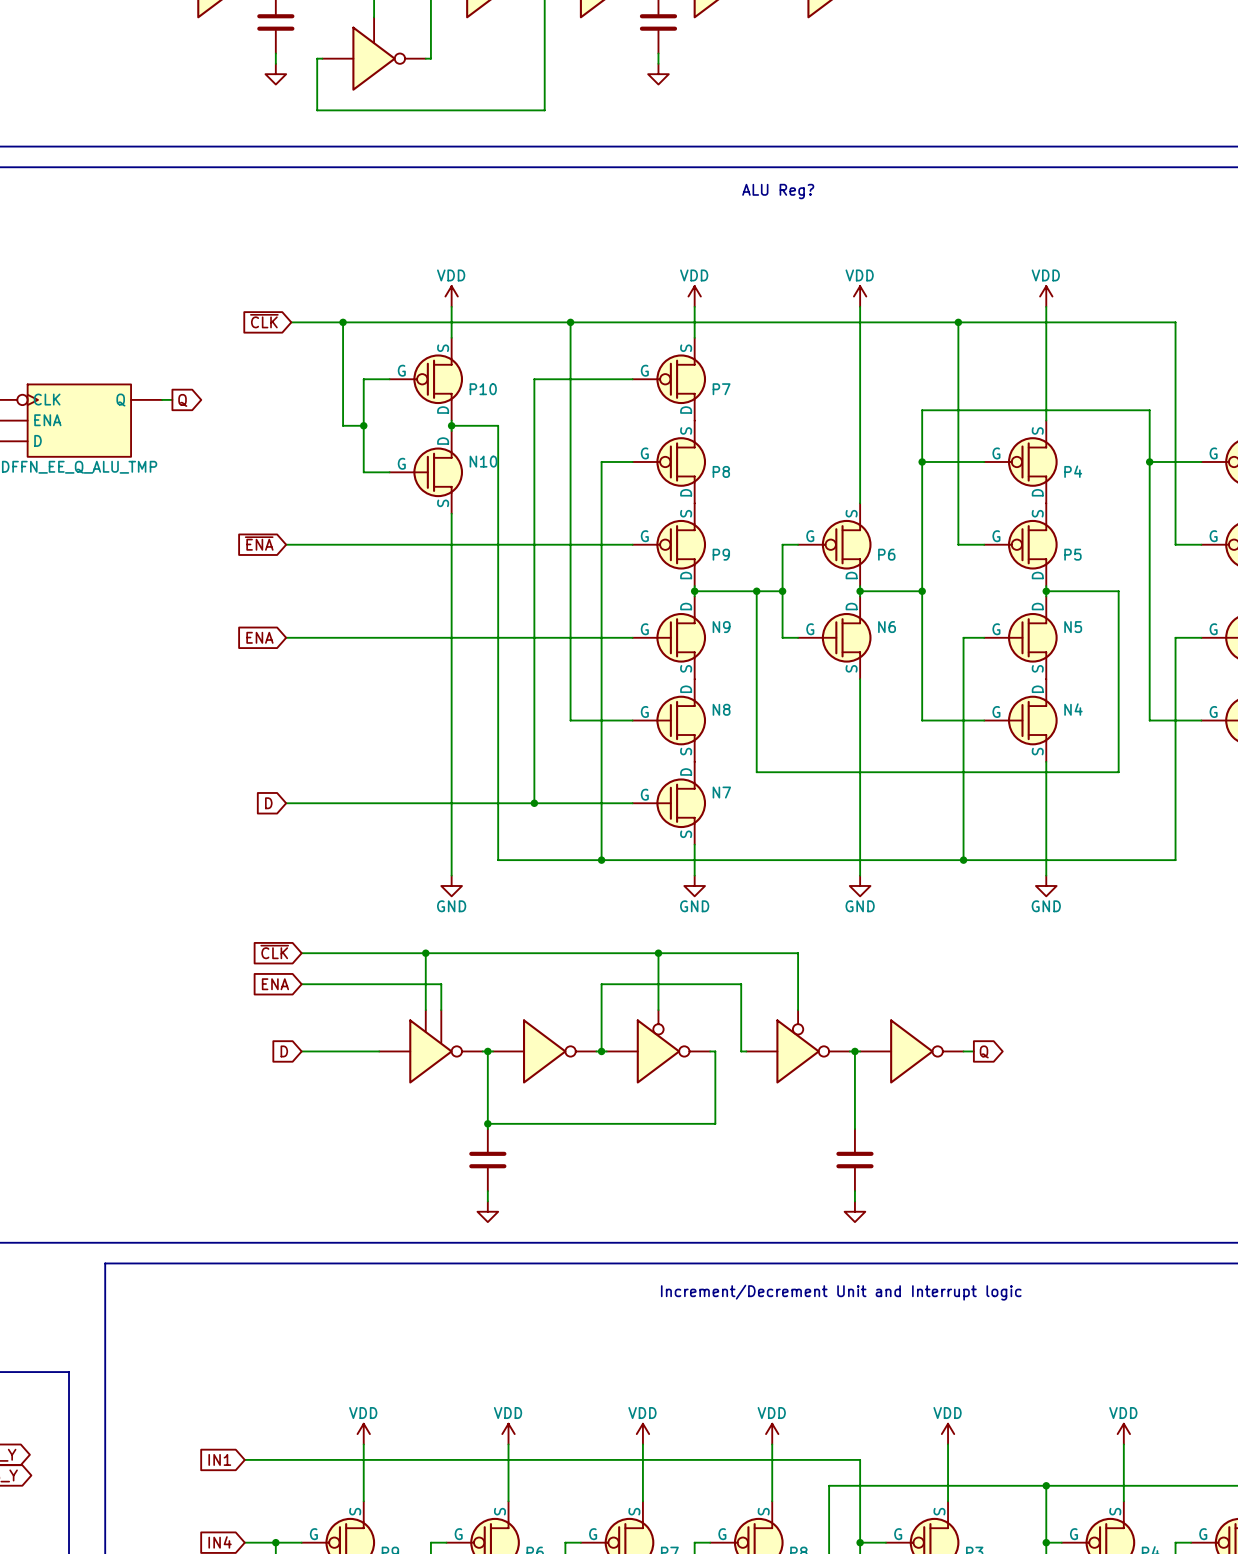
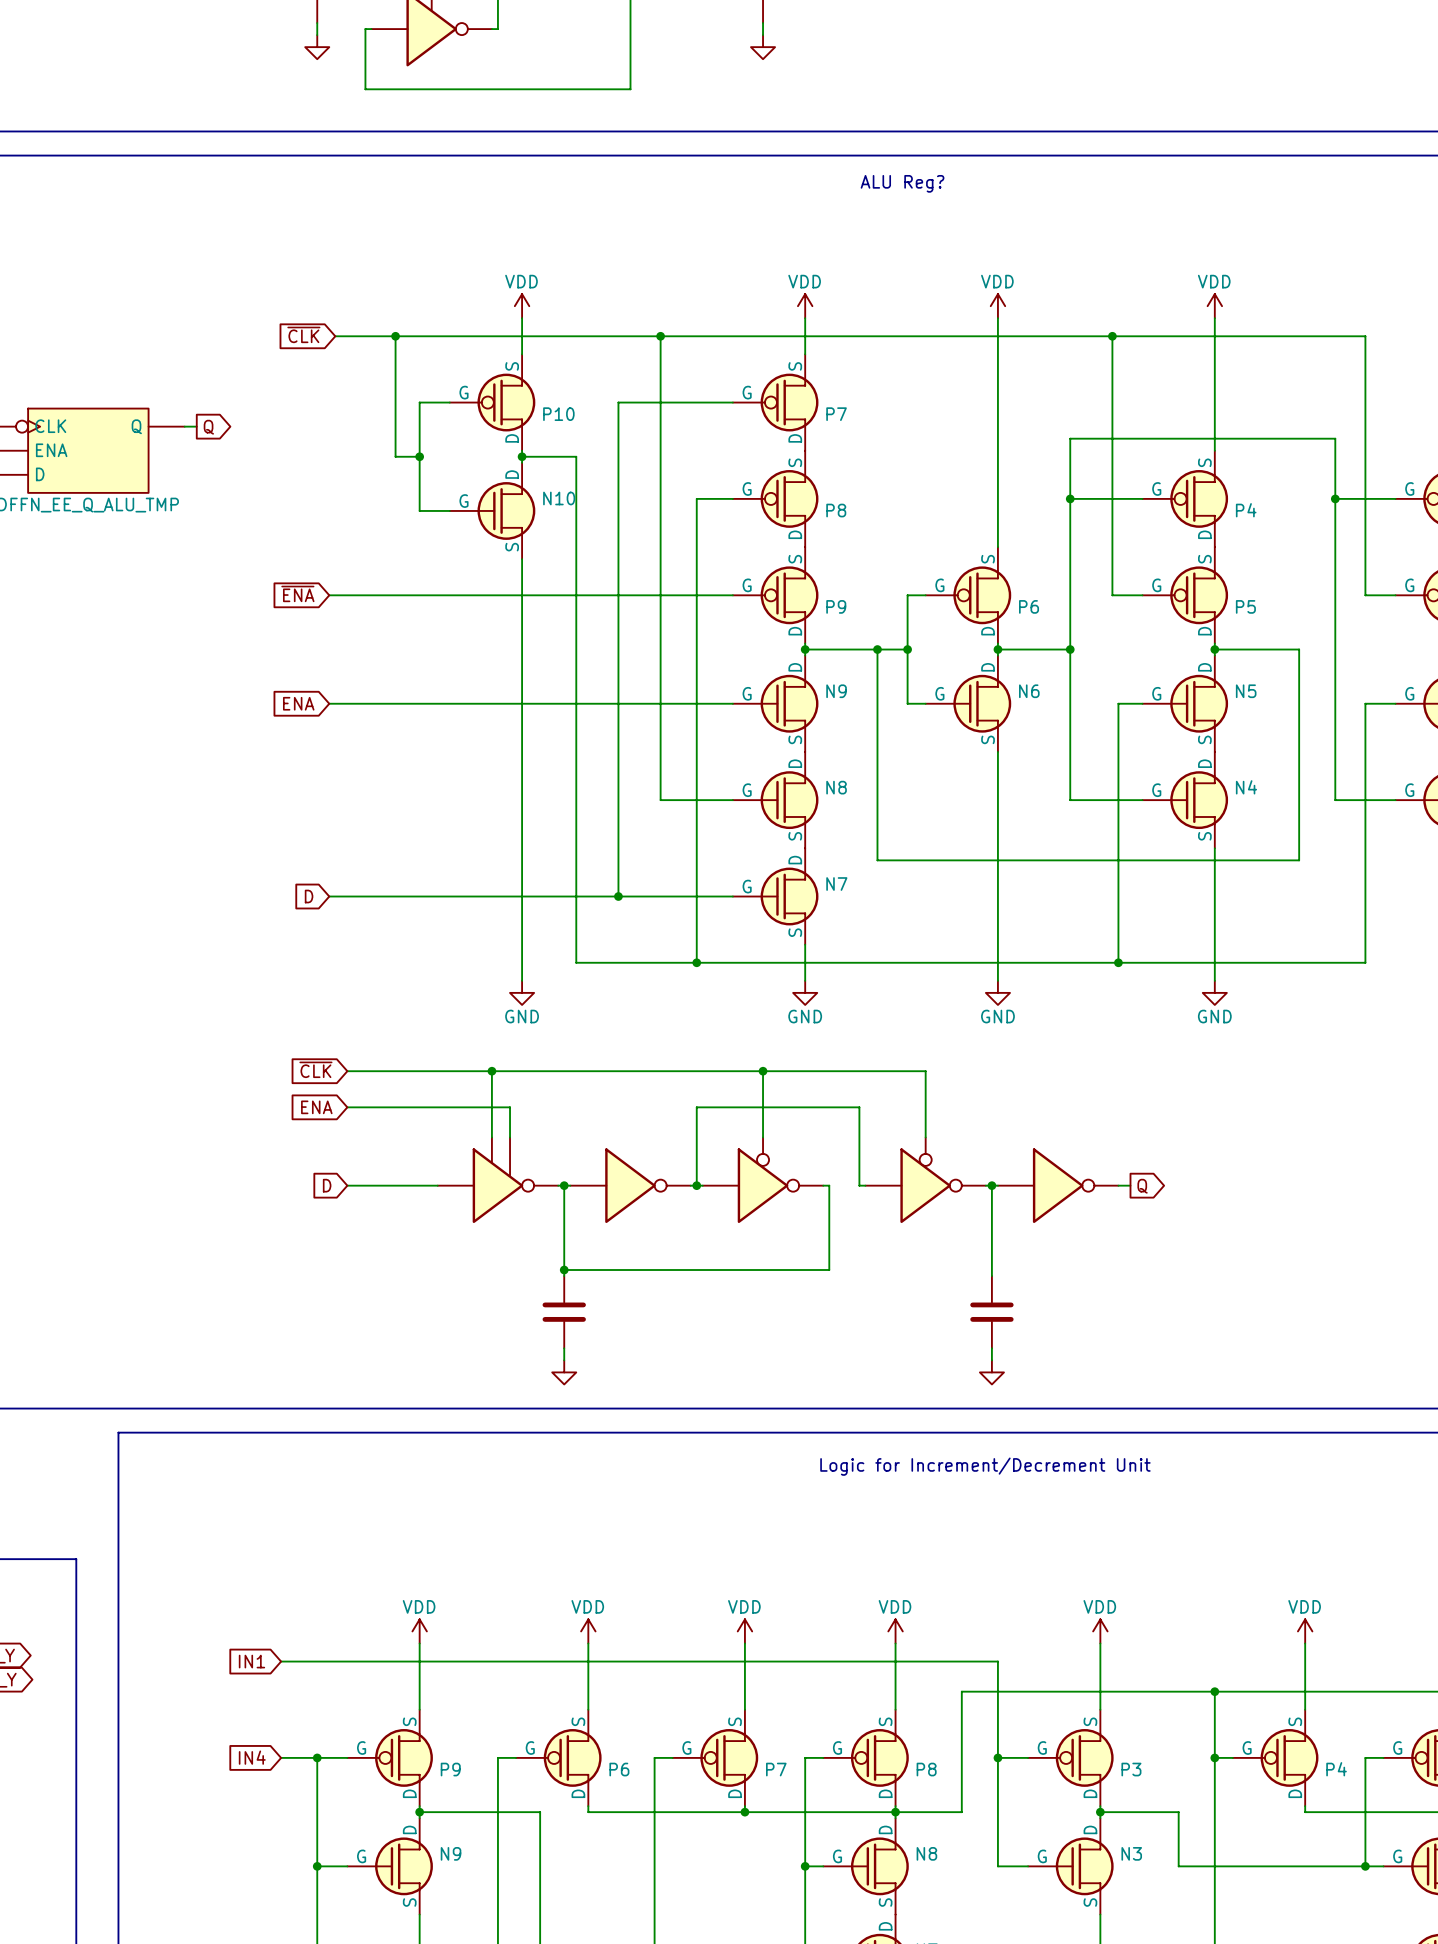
text: Increment/Decrement Unit and Interrupt logic (841, 1292) -> Logic for Increment/Decrement Unit (985, 1466)

